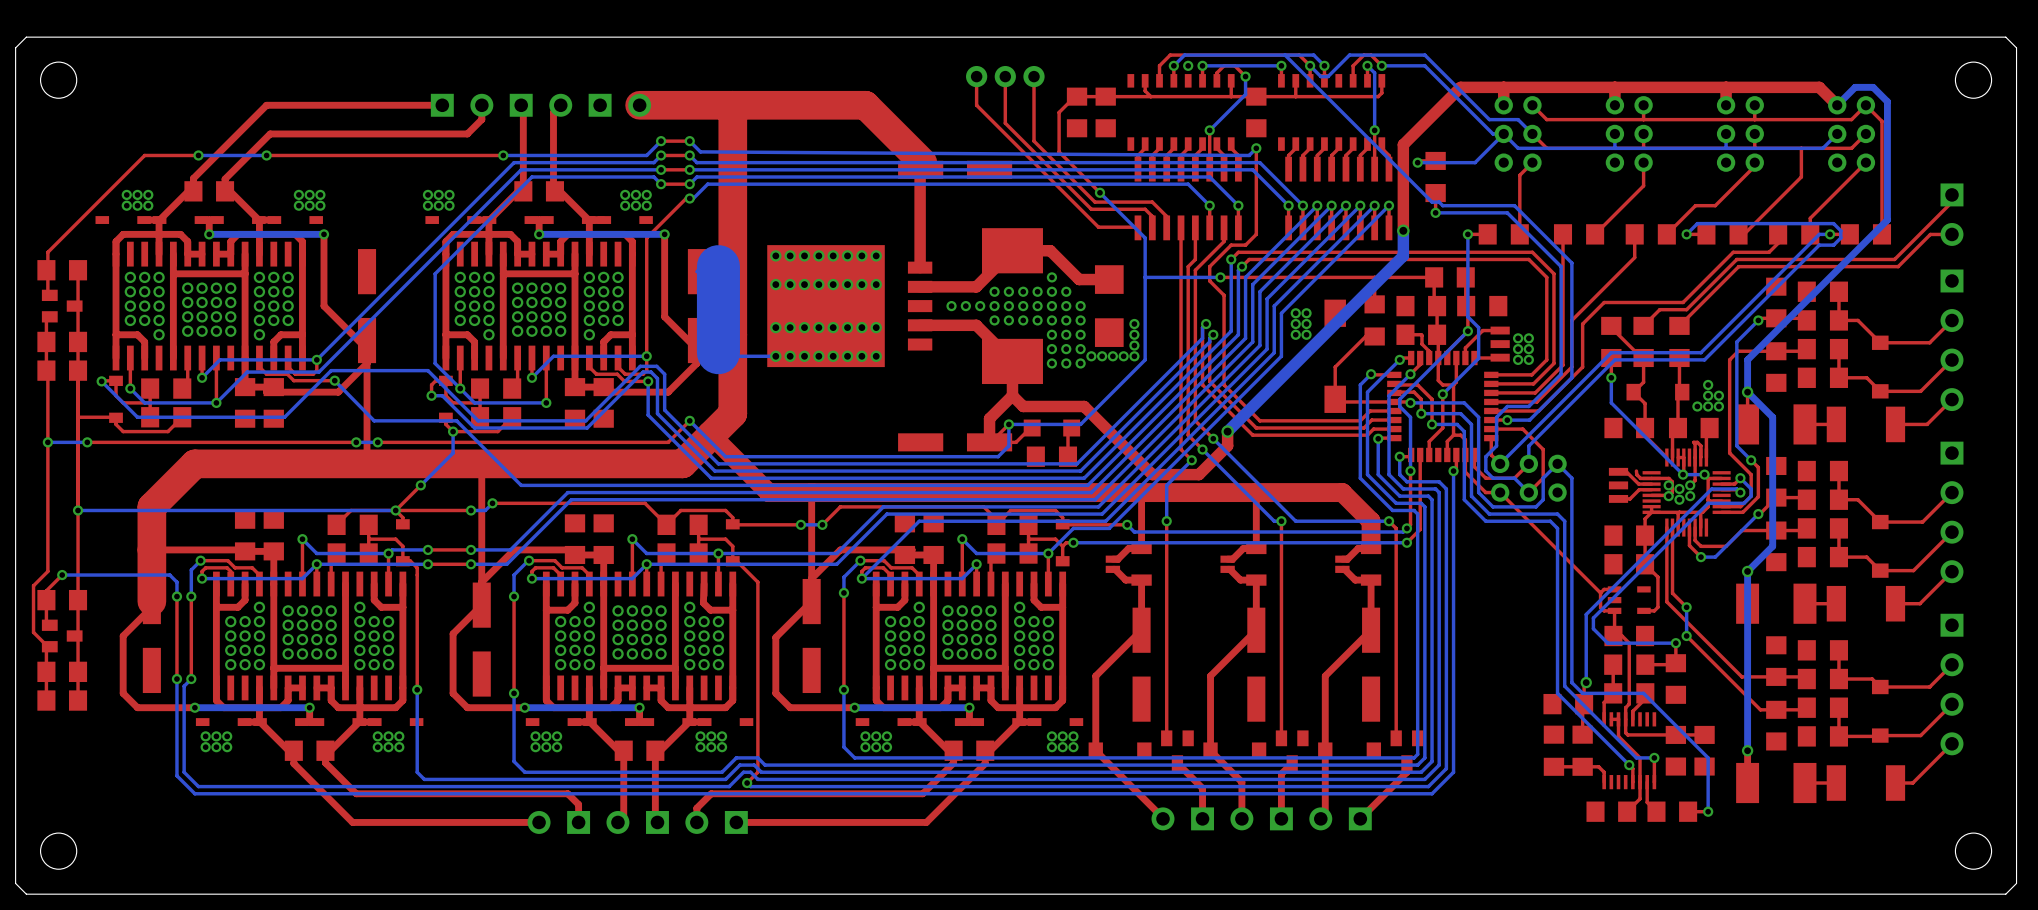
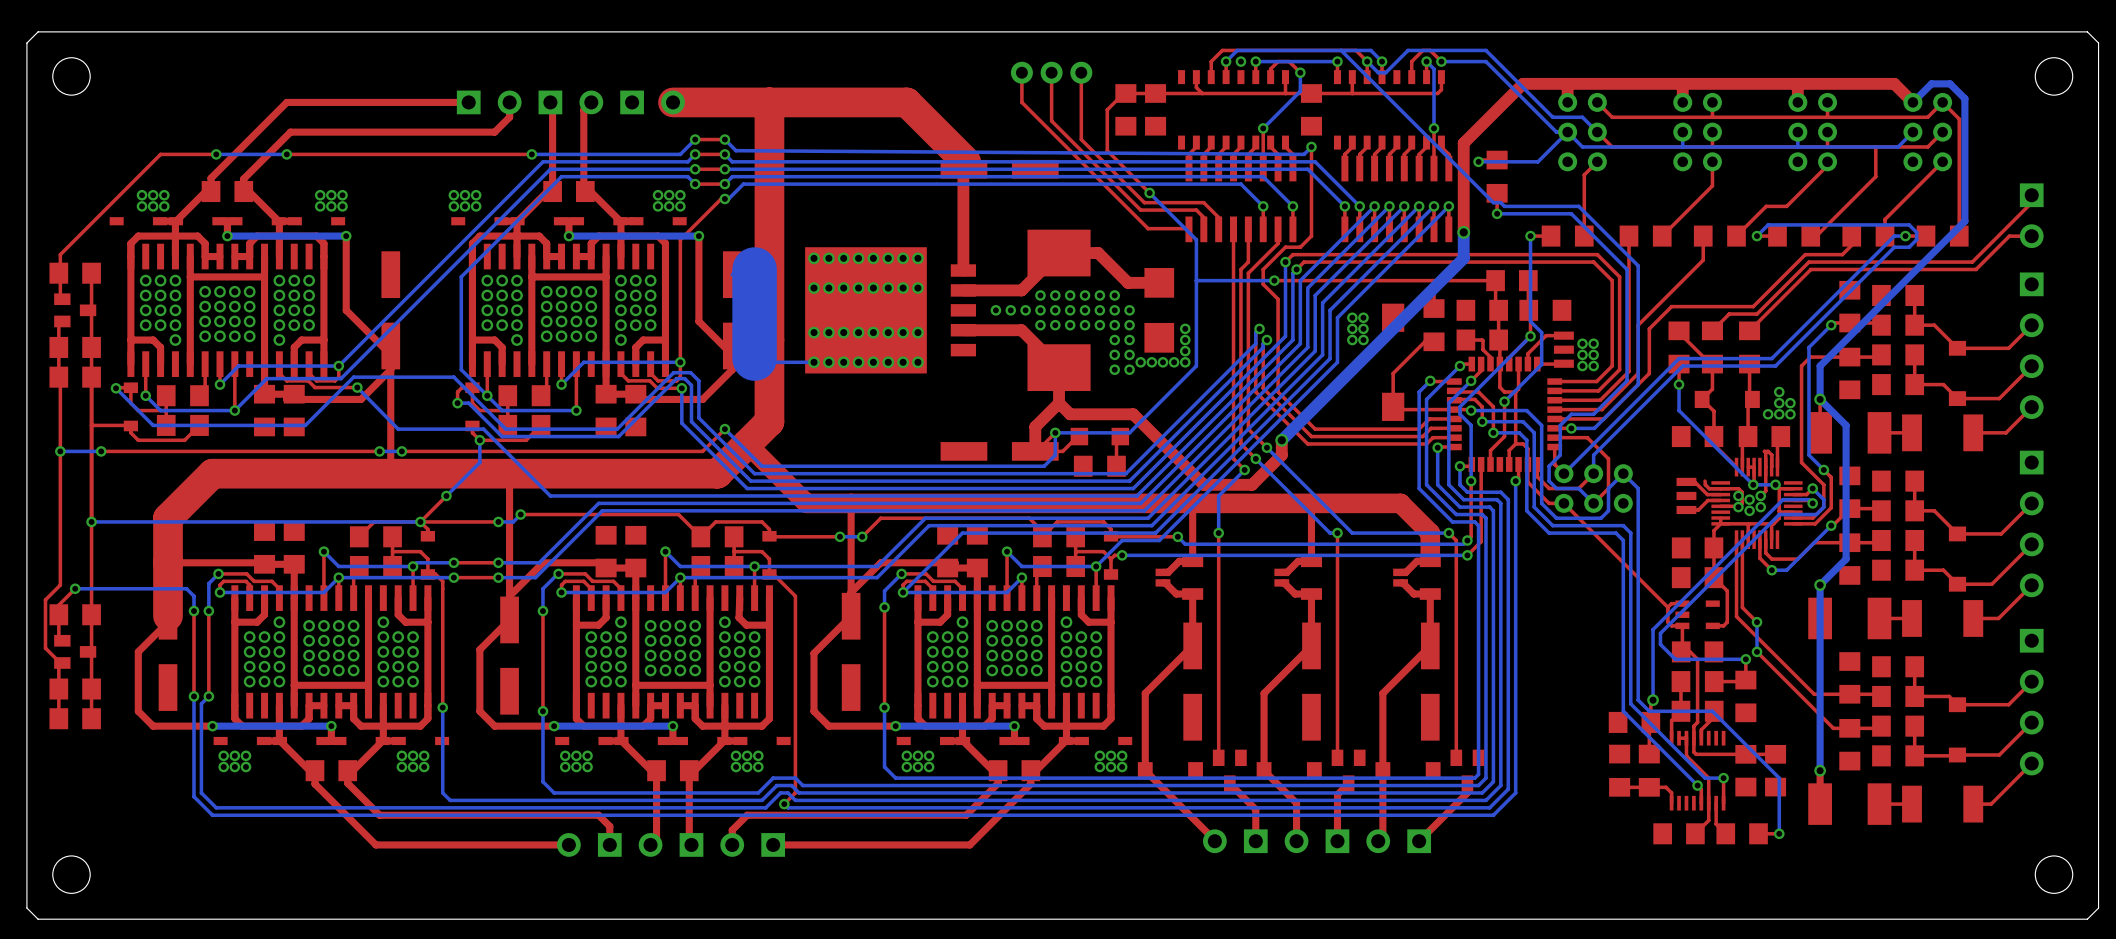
via: (1051, 277) -> none
via: (1051, 334) -> none
via: (1051, 349) -> none
via: (1051, 363) -> none

